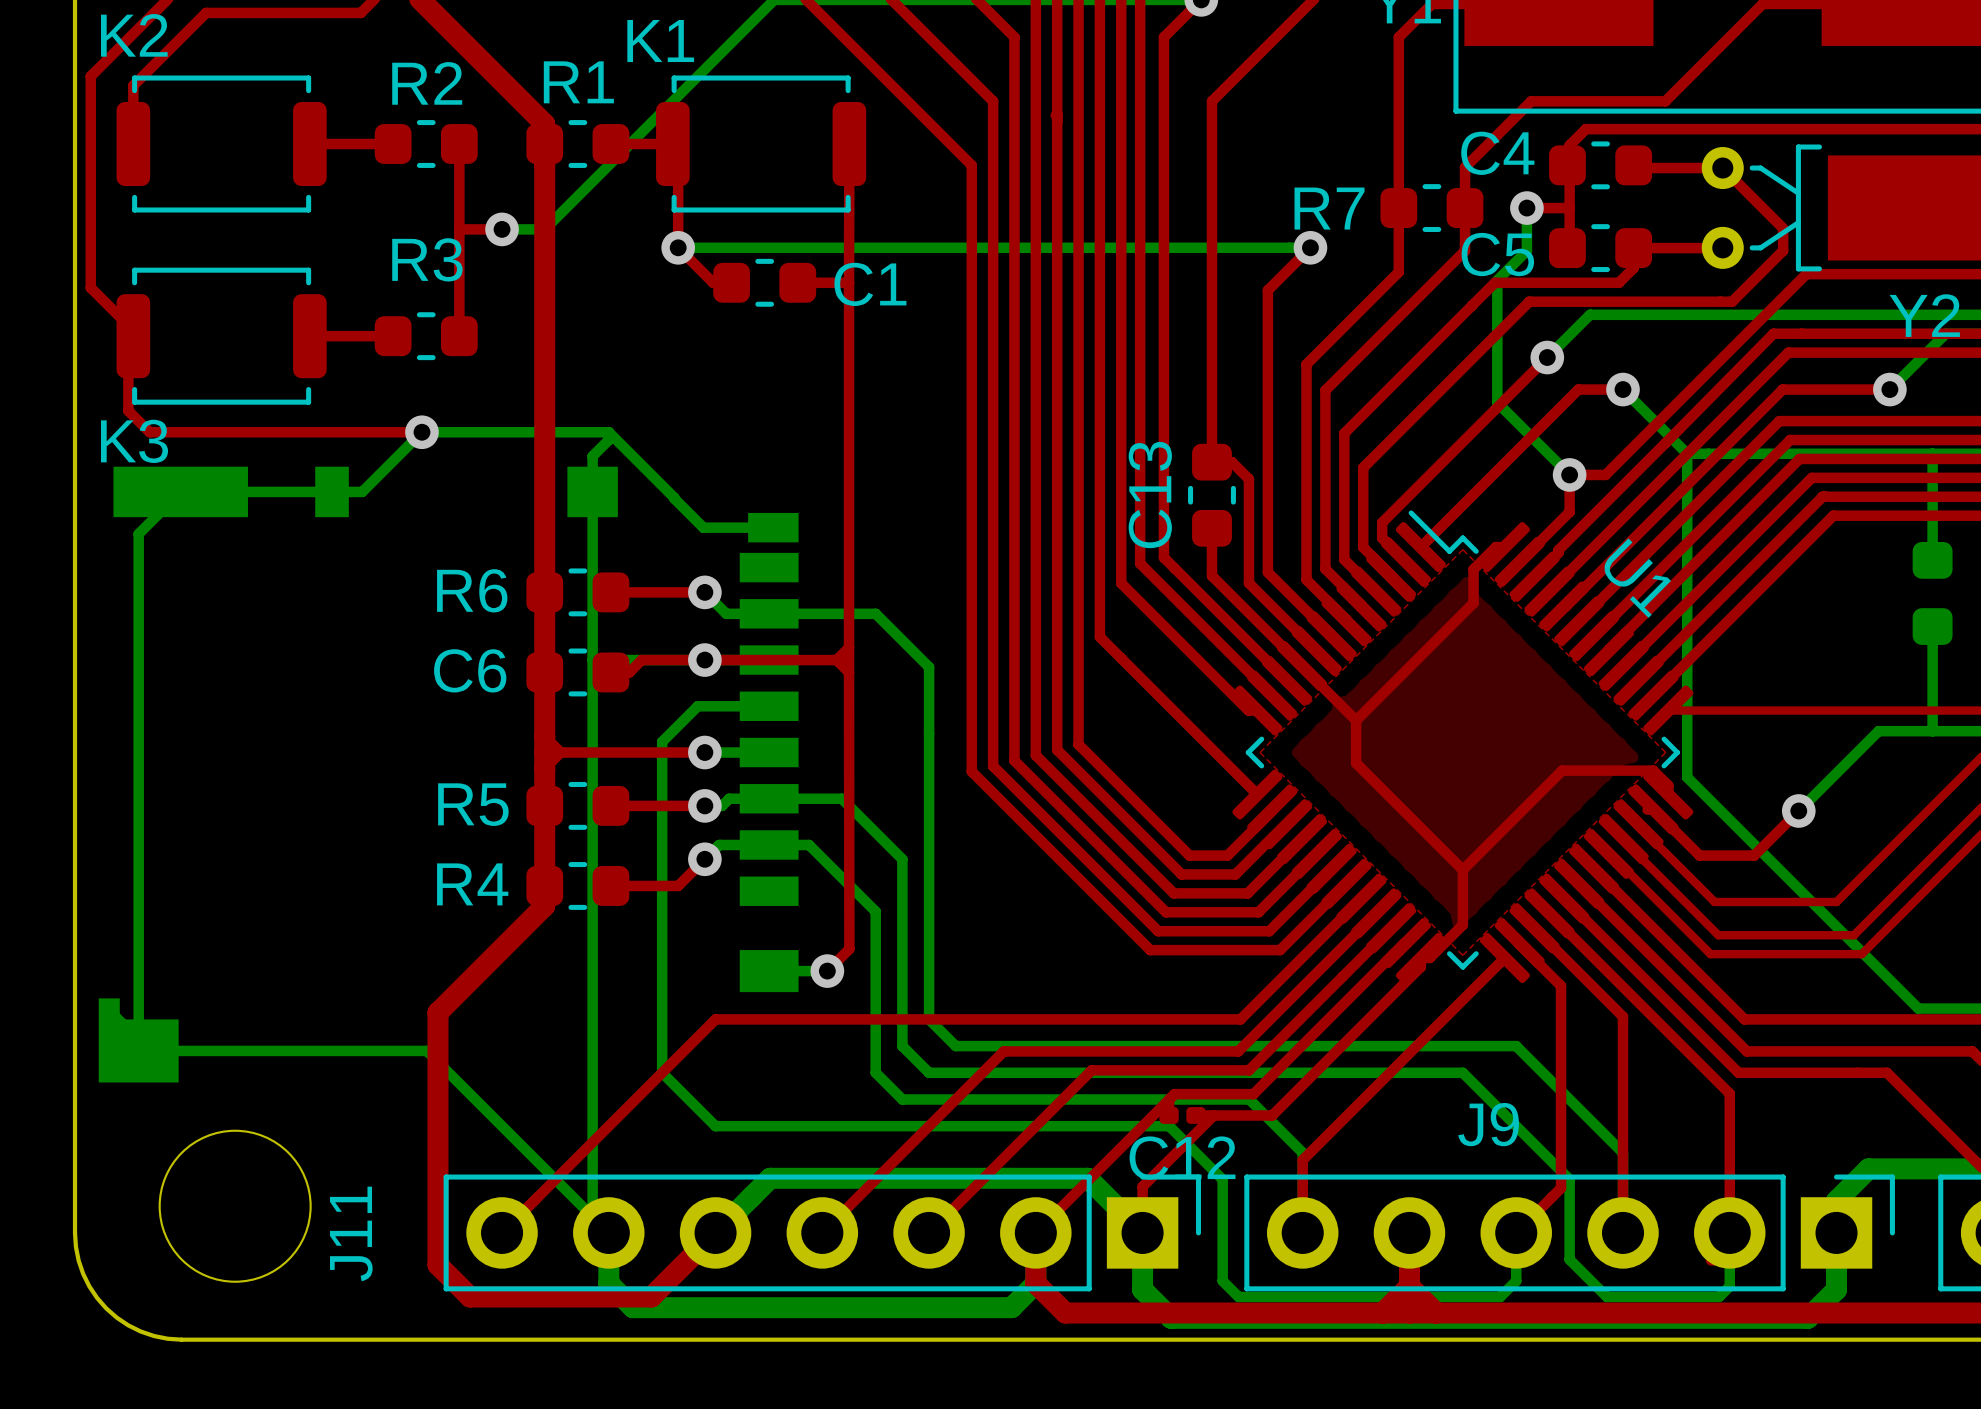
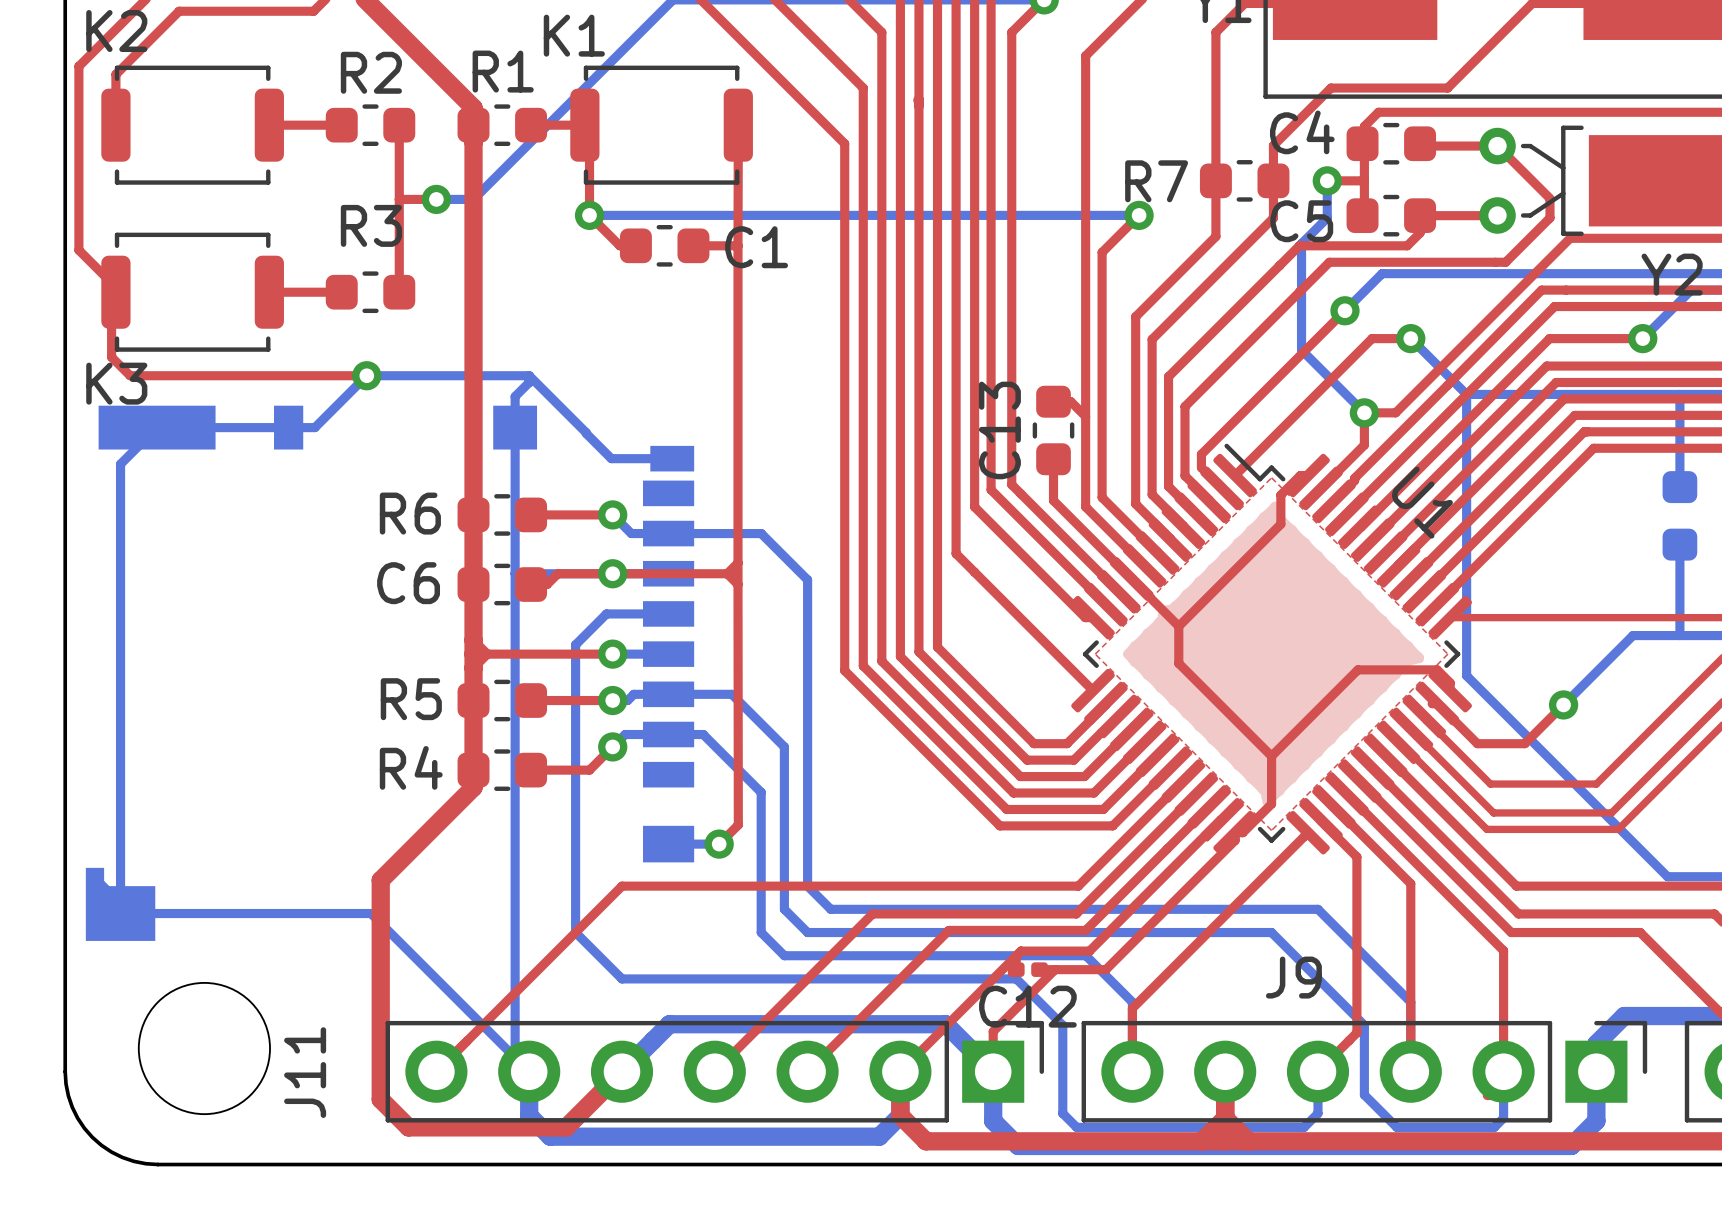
top track: (1248, 64) (1211, 101) (1211, 462) -> (1085, 55) (1085, 416)

